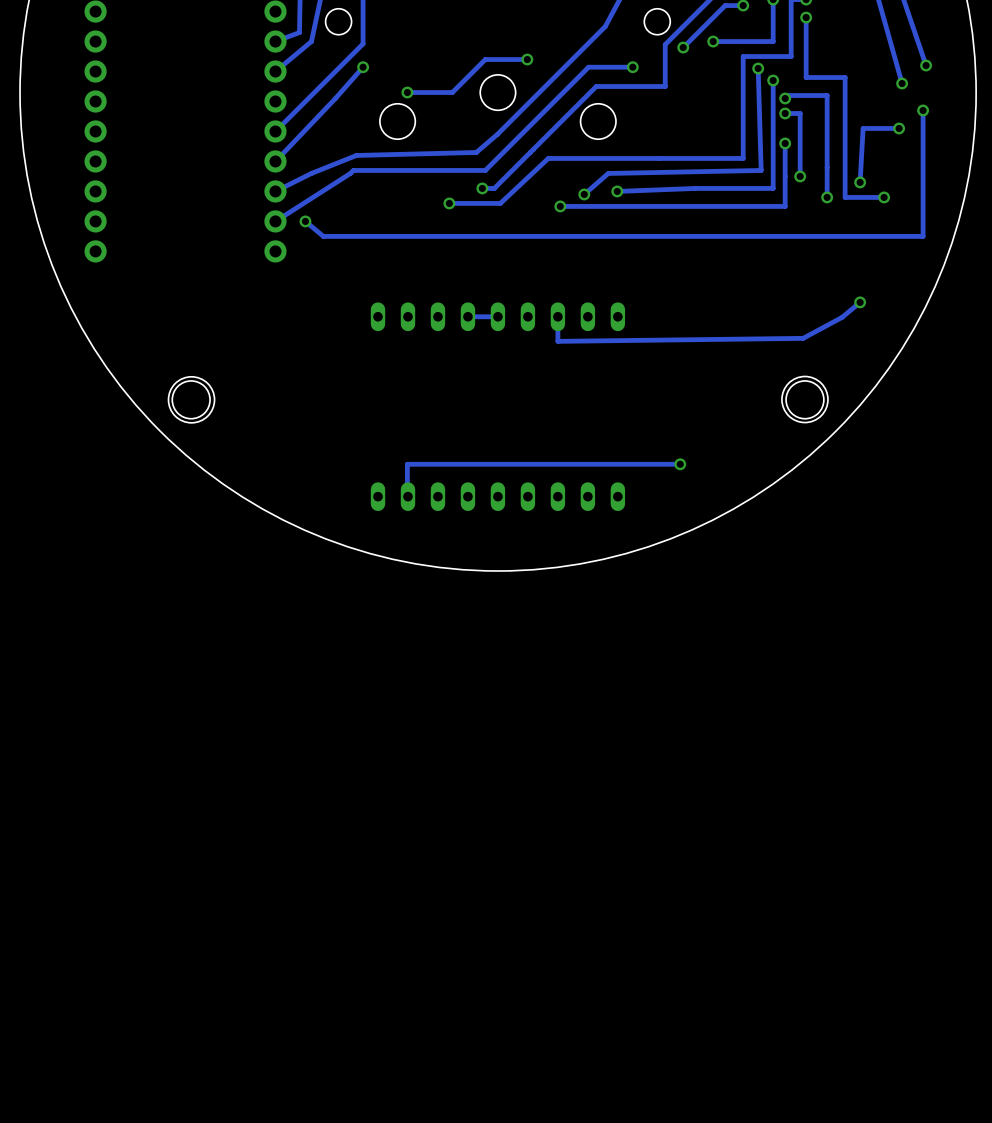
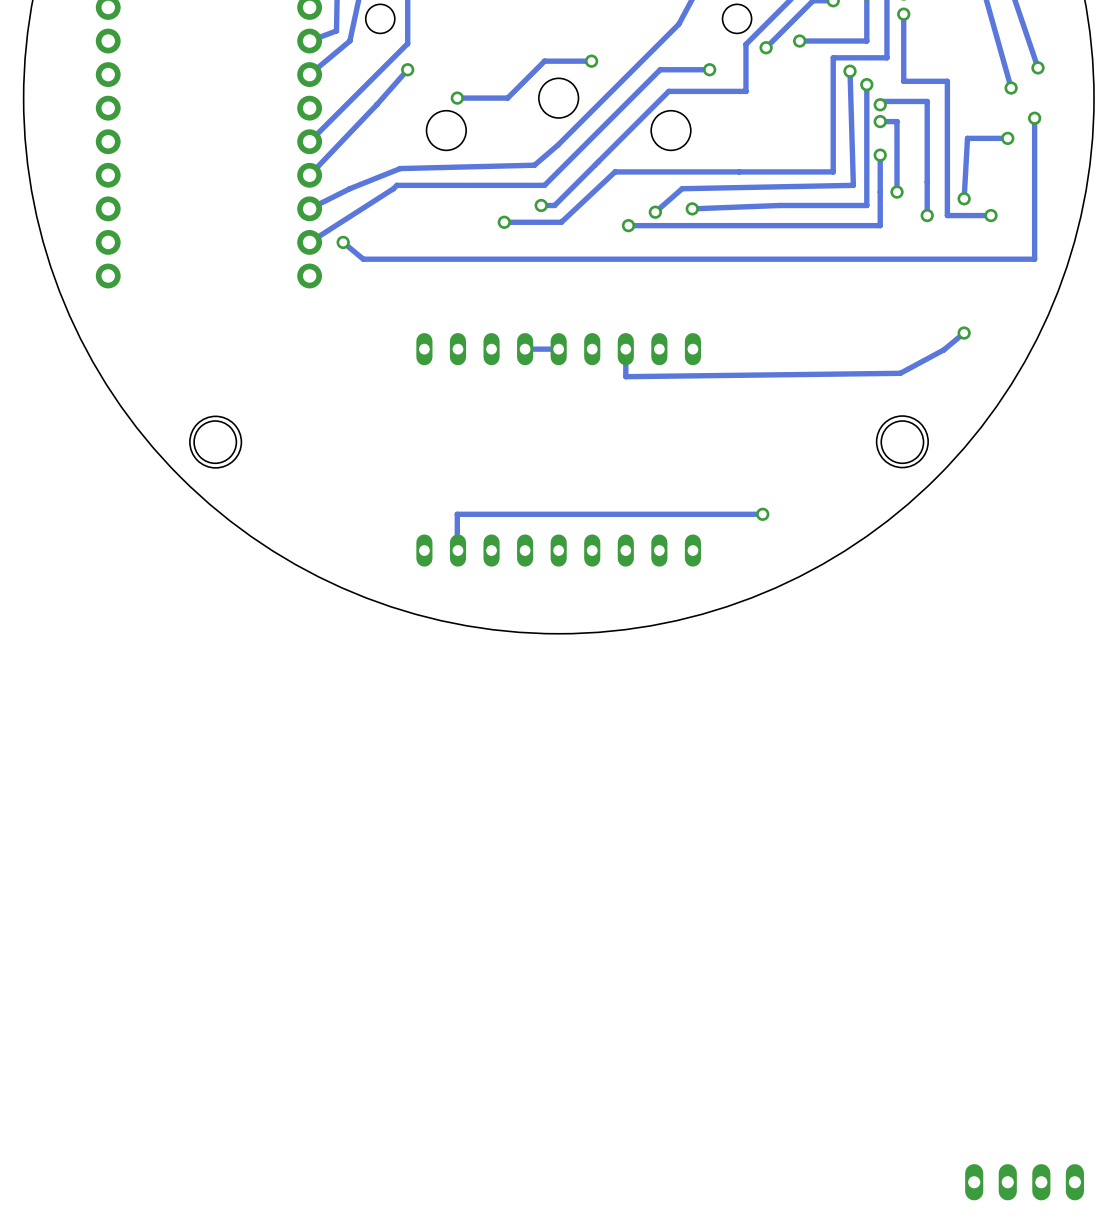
part: none -> (1024, 1182)

